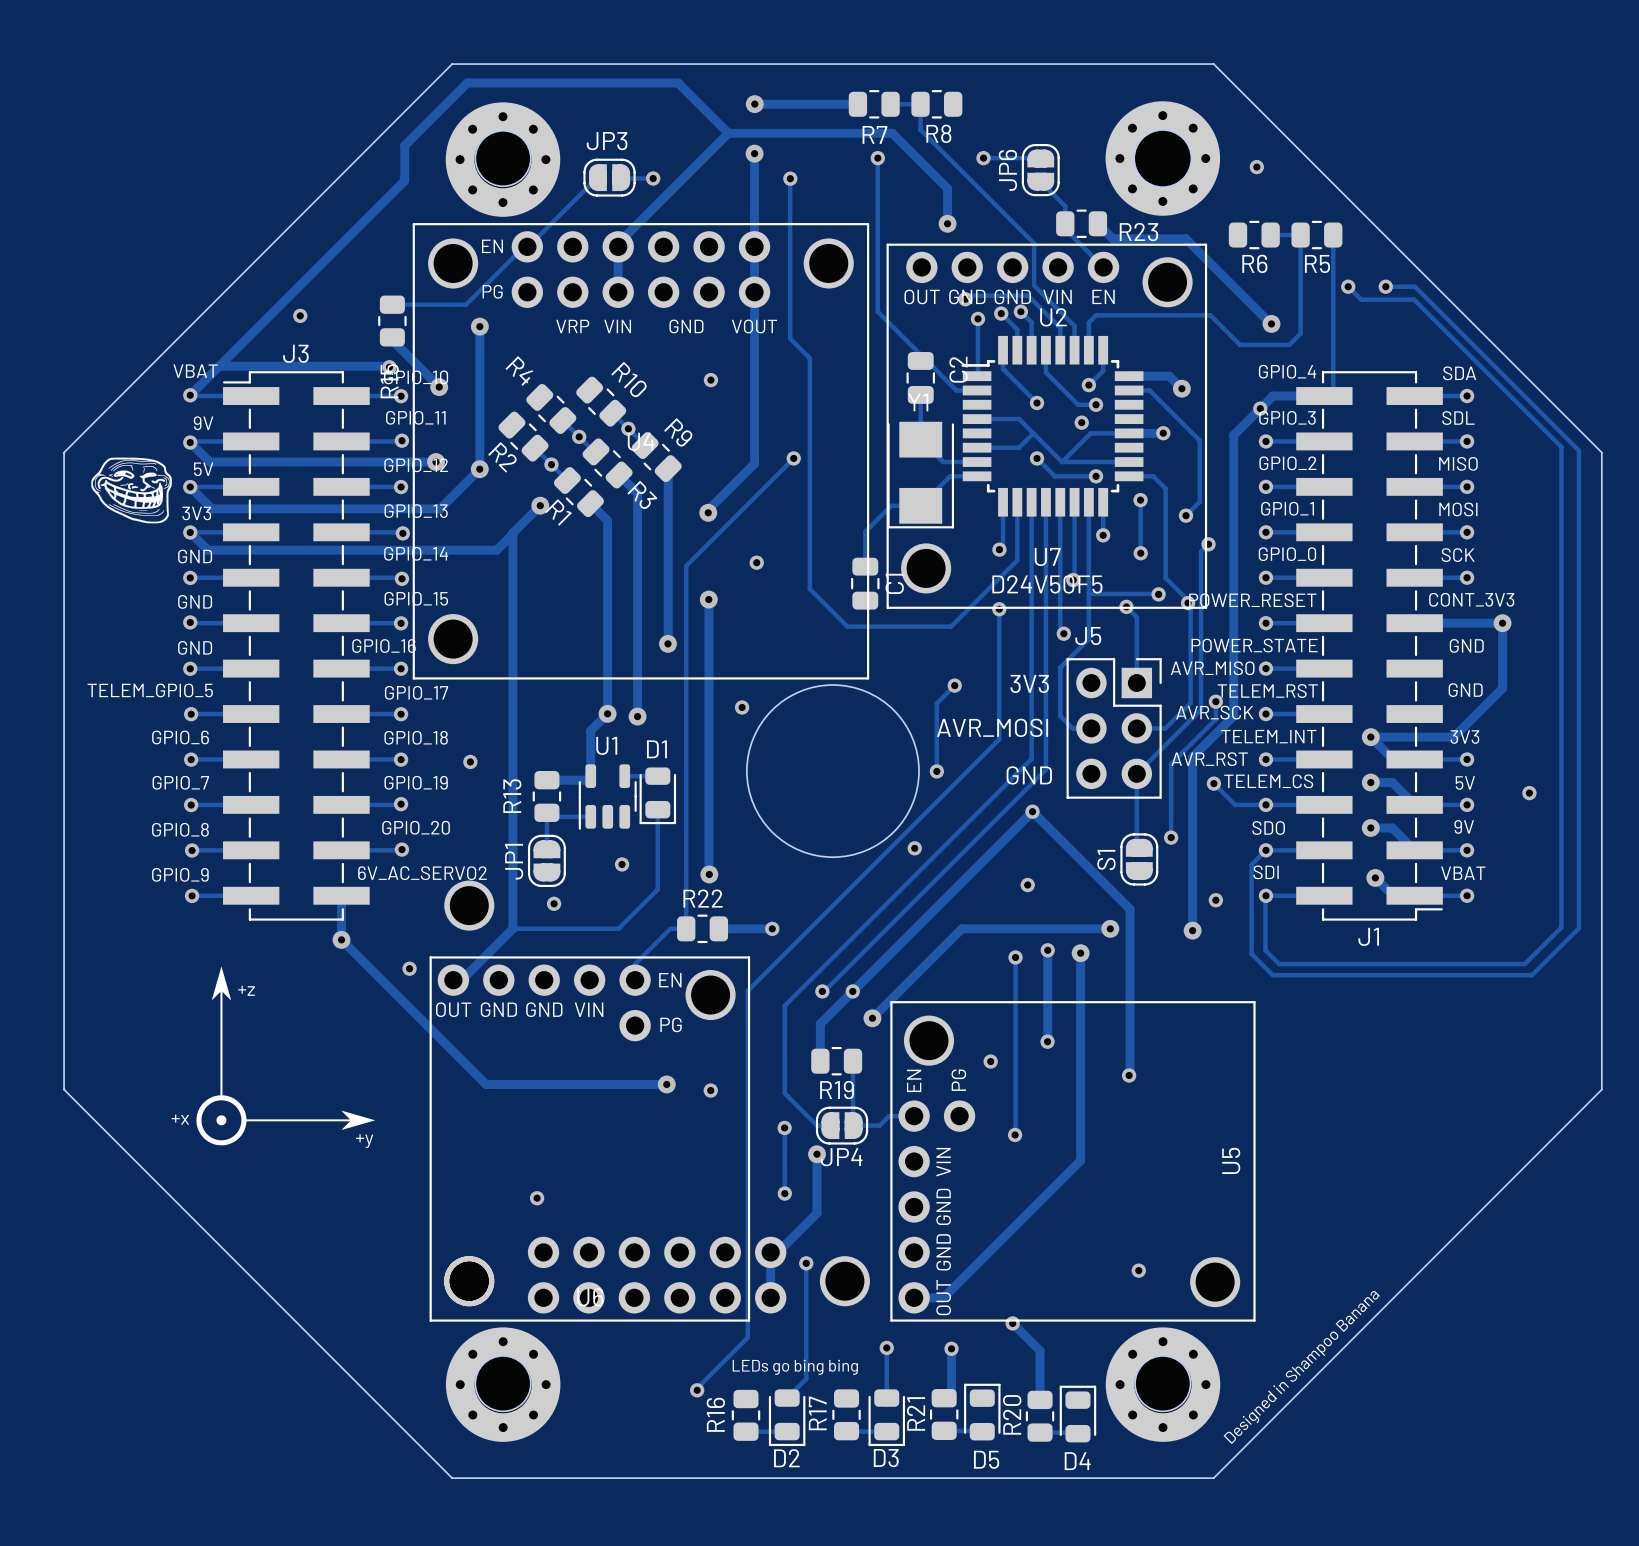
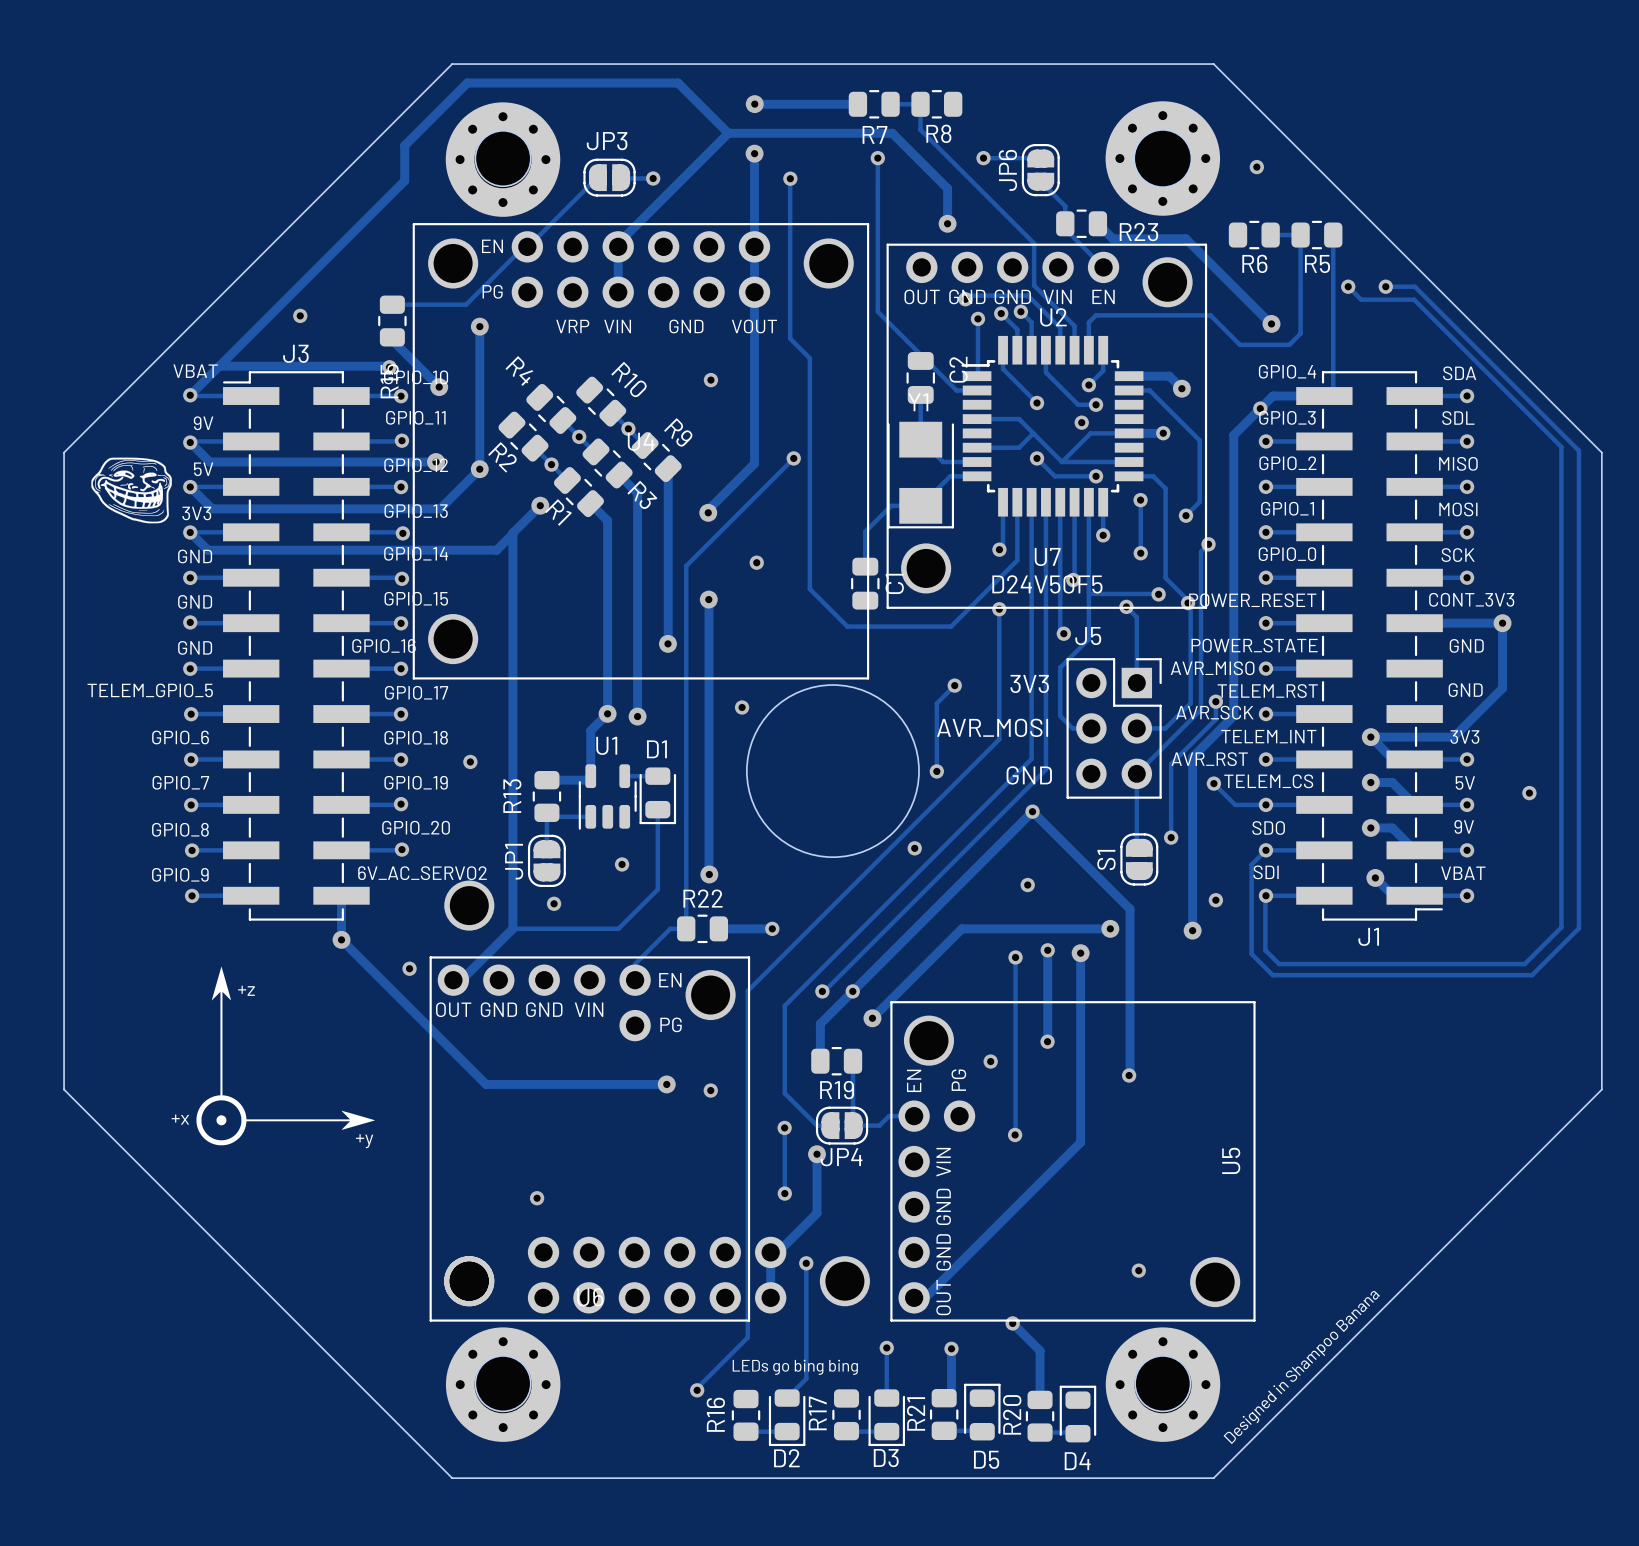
track: (1080, 1142) (1080, 1160) (943, 1297) (914, 1297) -> (1080, 1142) (914, 1308)

